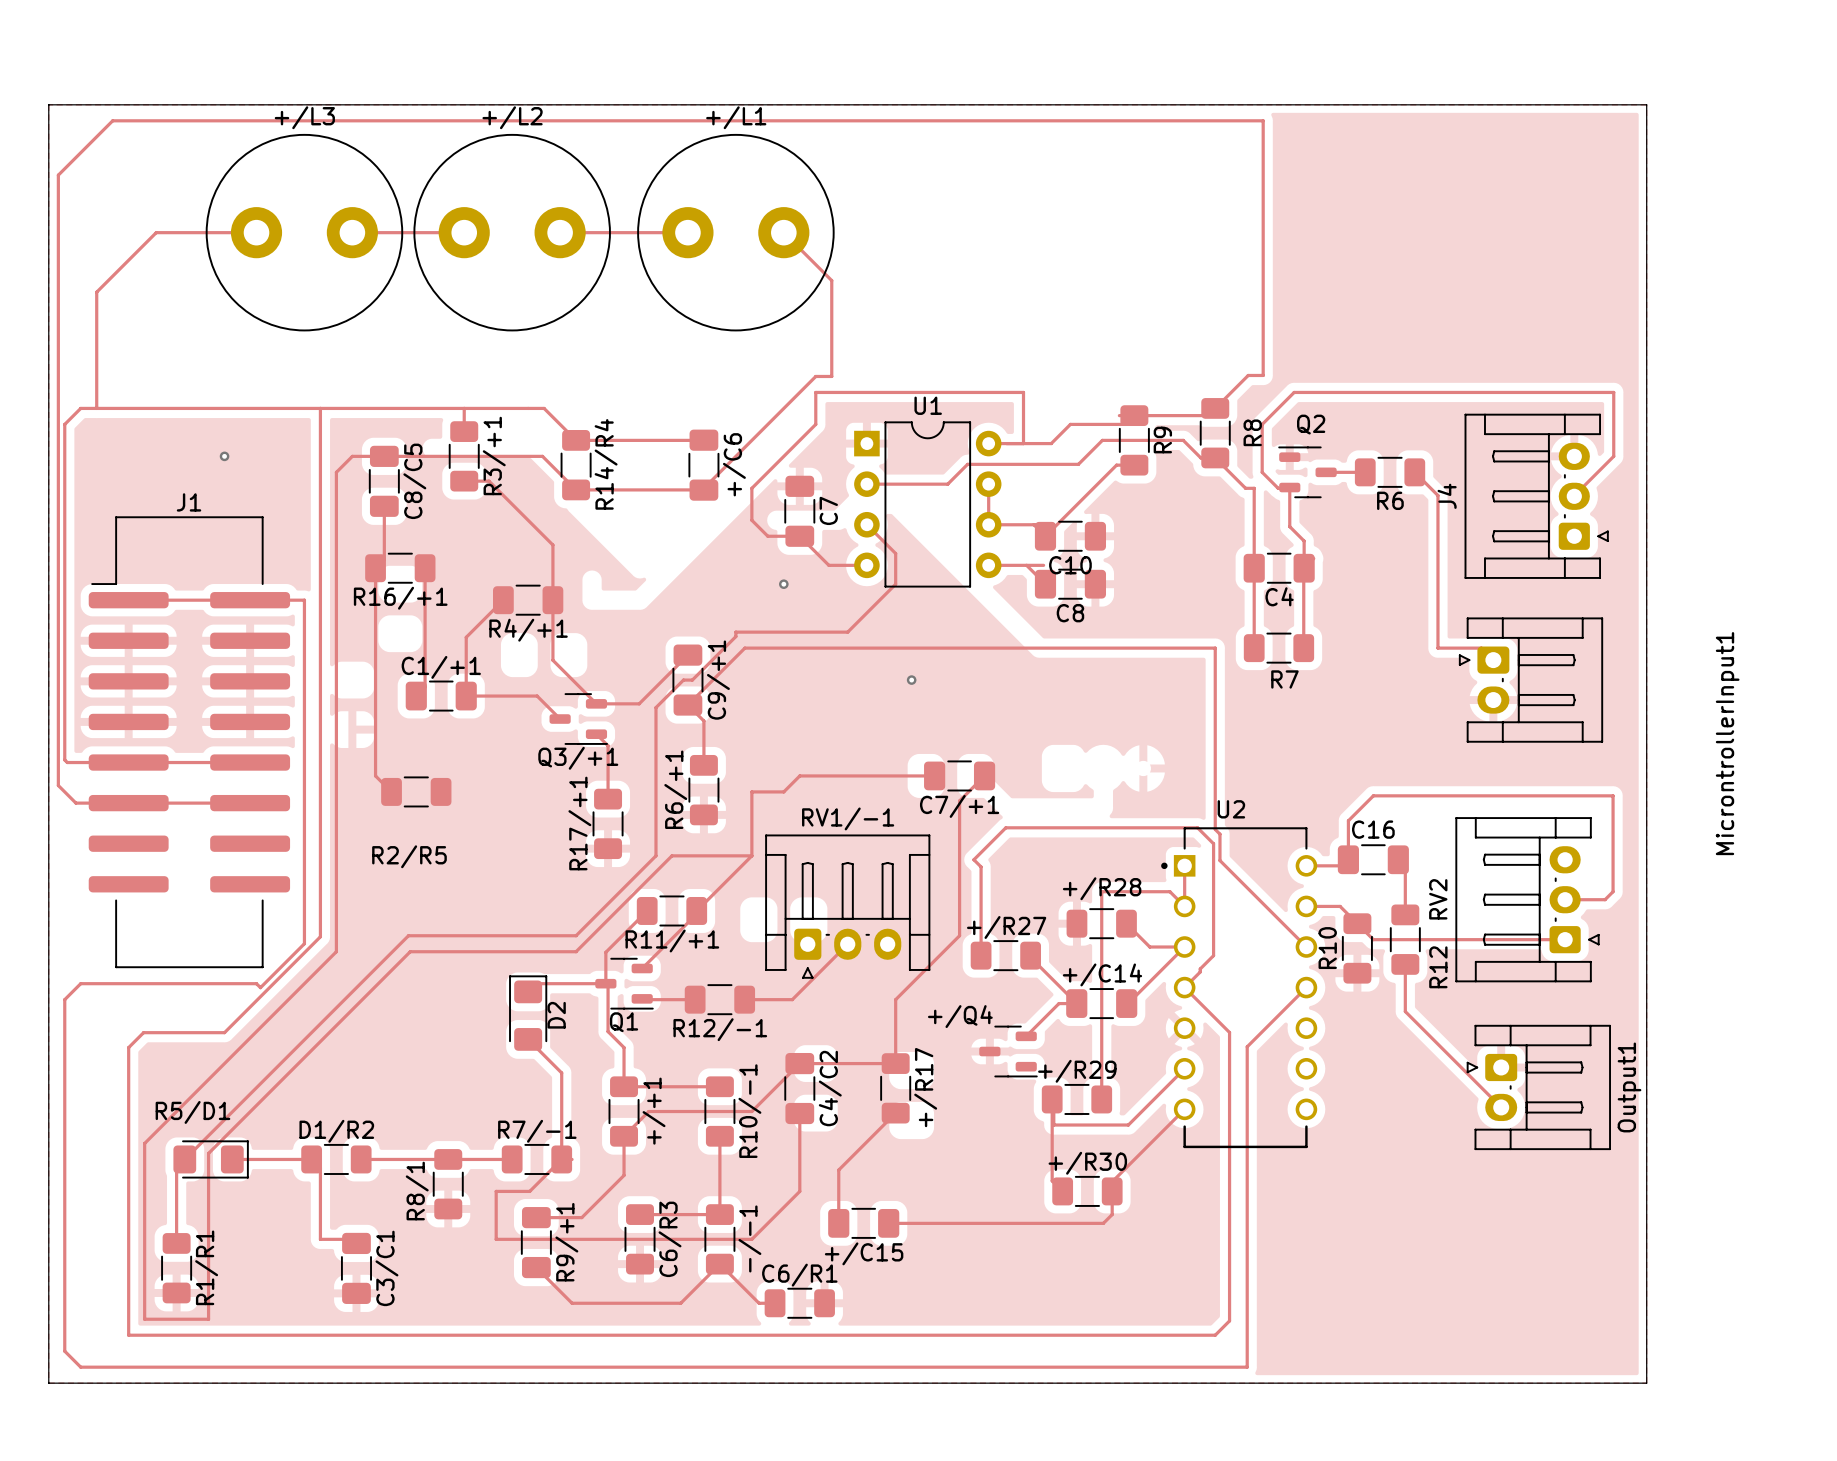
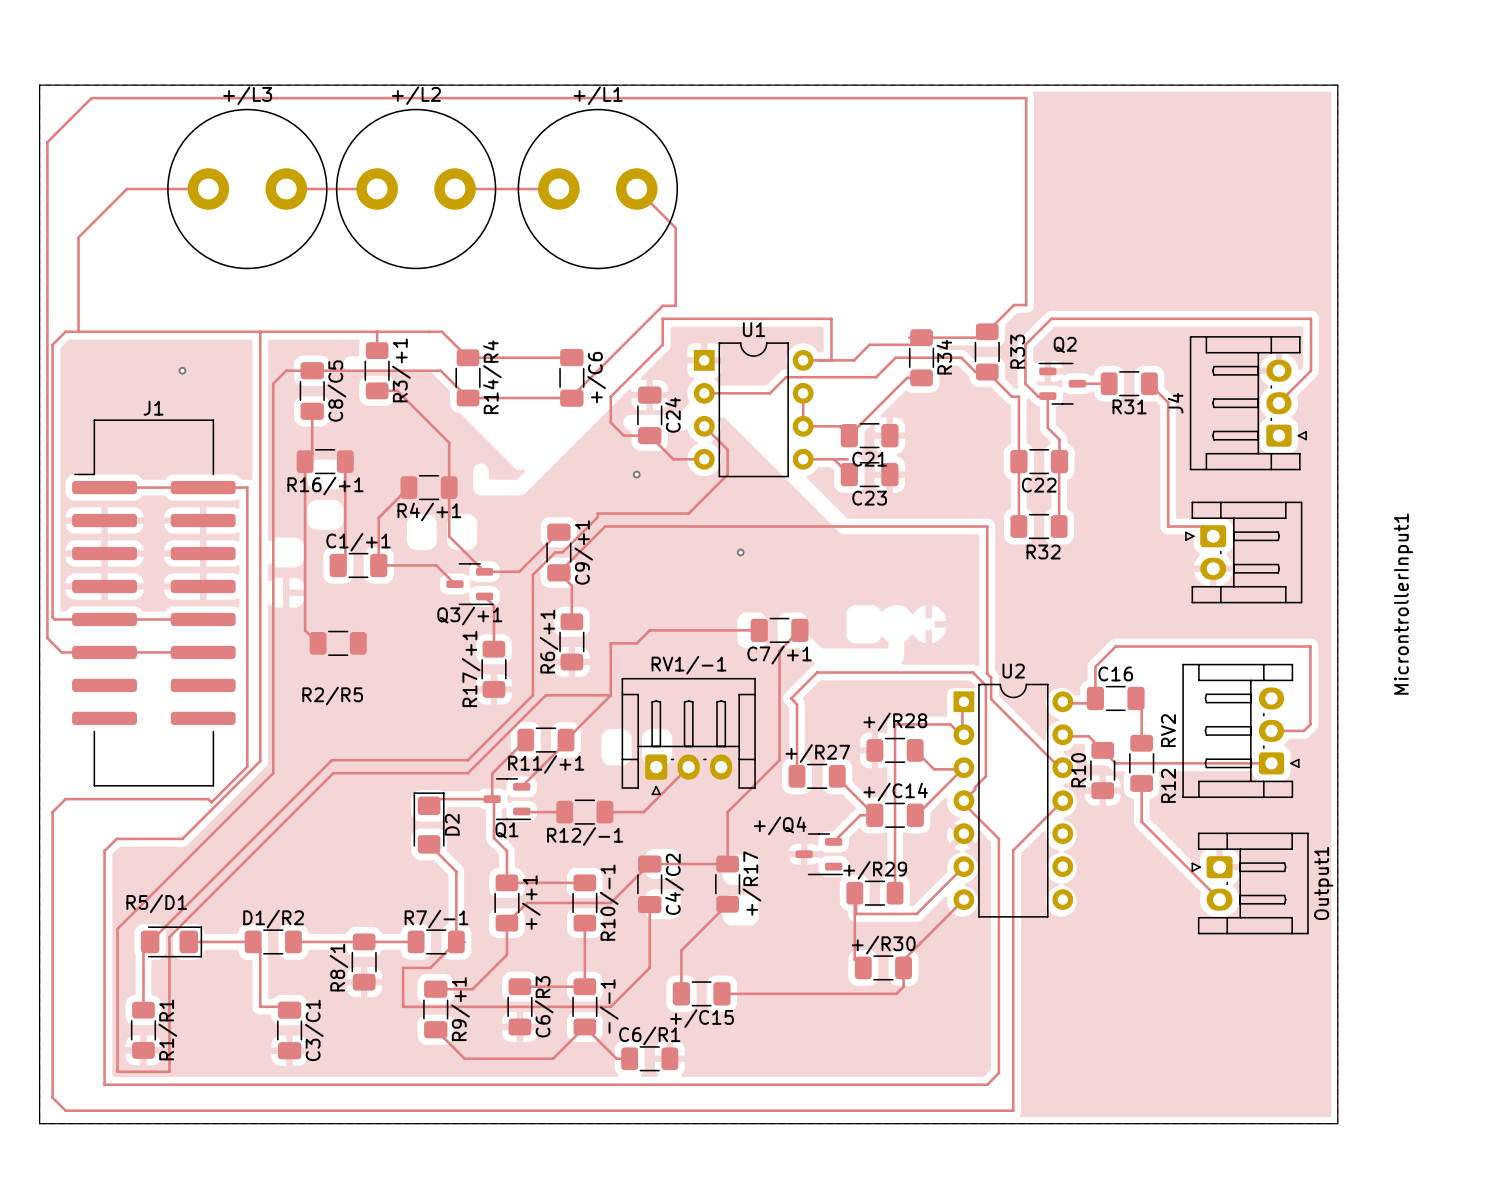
R8 name: R8 (1252, 432) -> R33 (1017, 351)
R9 name: R9 (1162, 440) -> R34 (944, 357)
R6 name: R6 (1390, 500) -> R31 (1129, 406)
C7 name: C7 (828, 510) -> C24 (672, 415)
C10 name: C10 (1070, 565) -> C21 (869, 459)
C4 name: C4 (1279, 596) -> C22 (1039, 485)
C8 name: C8 (1070, 613) -> C23 (869, 498)
R7 name: R7 (1284, 679) -> R32 (1043, 552)
U2 footprint: [1161, 827, 1318, 1149] -> [953, 683, 1074, 918]

